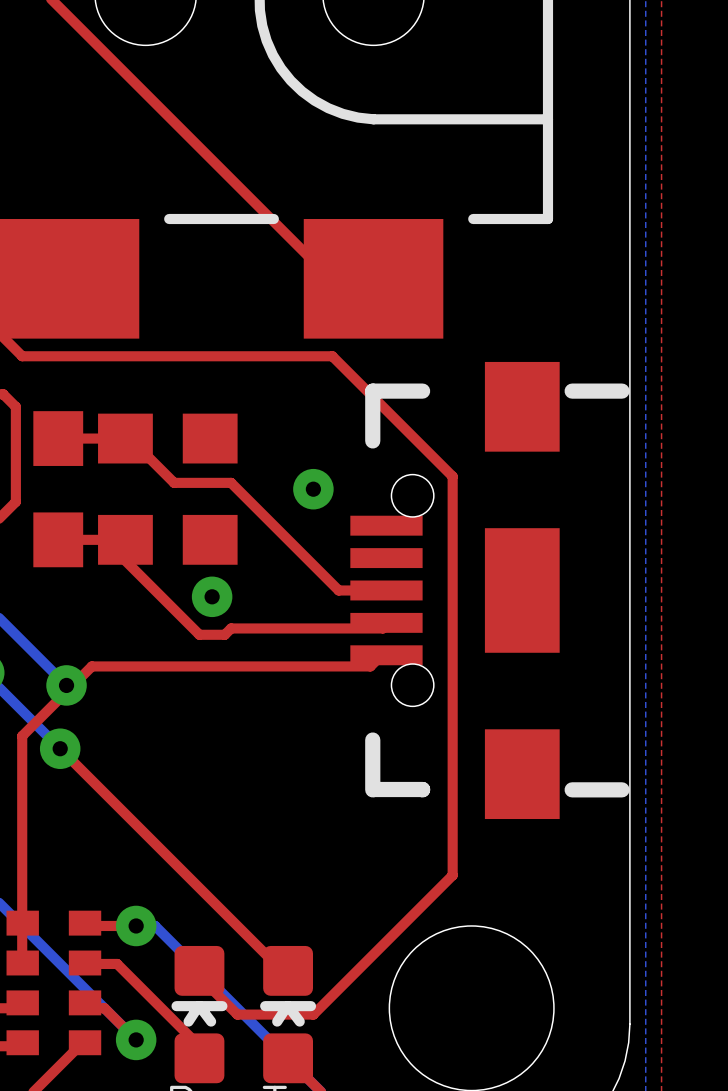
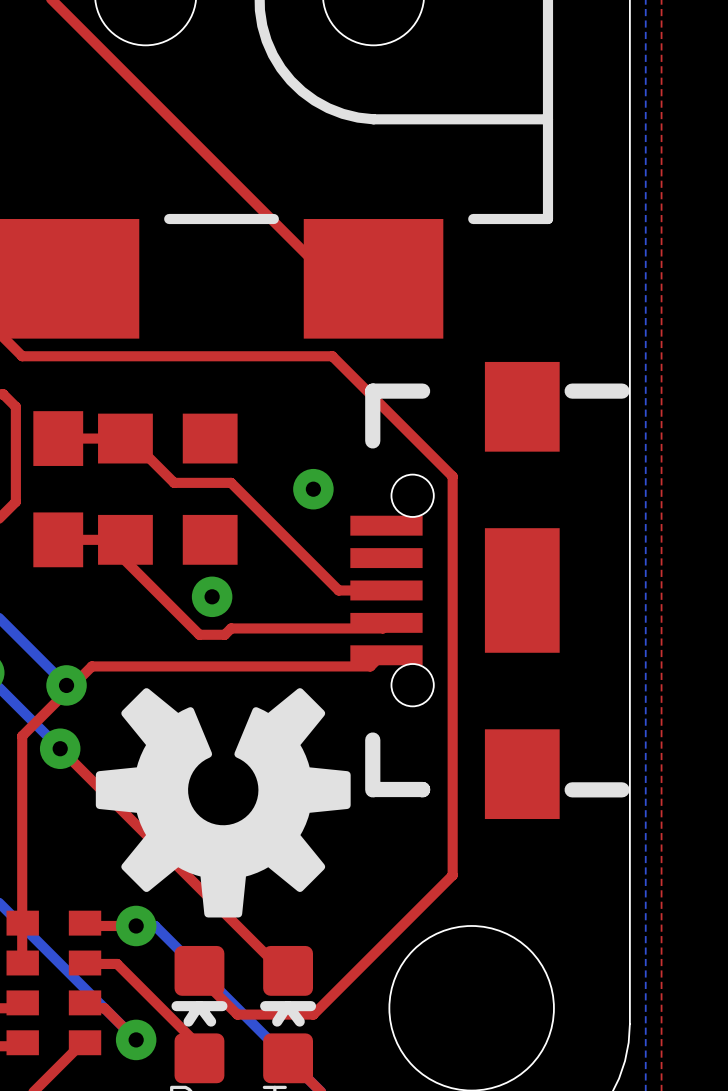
drawing: none -> [95, 688, 351, 918]

